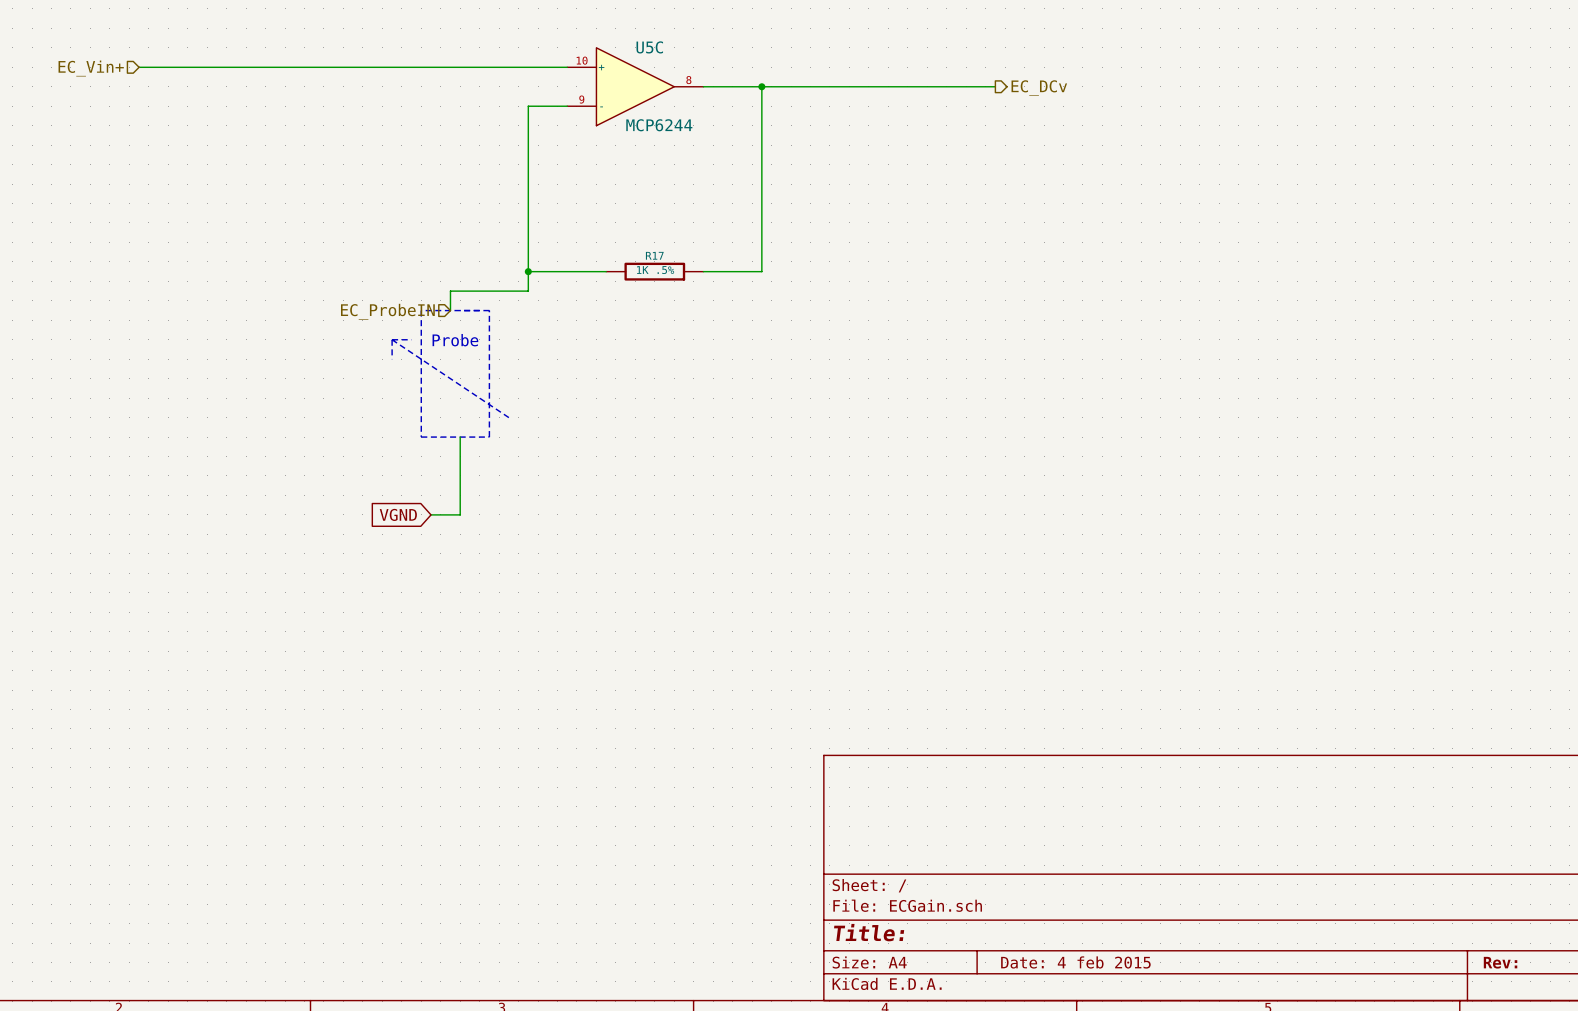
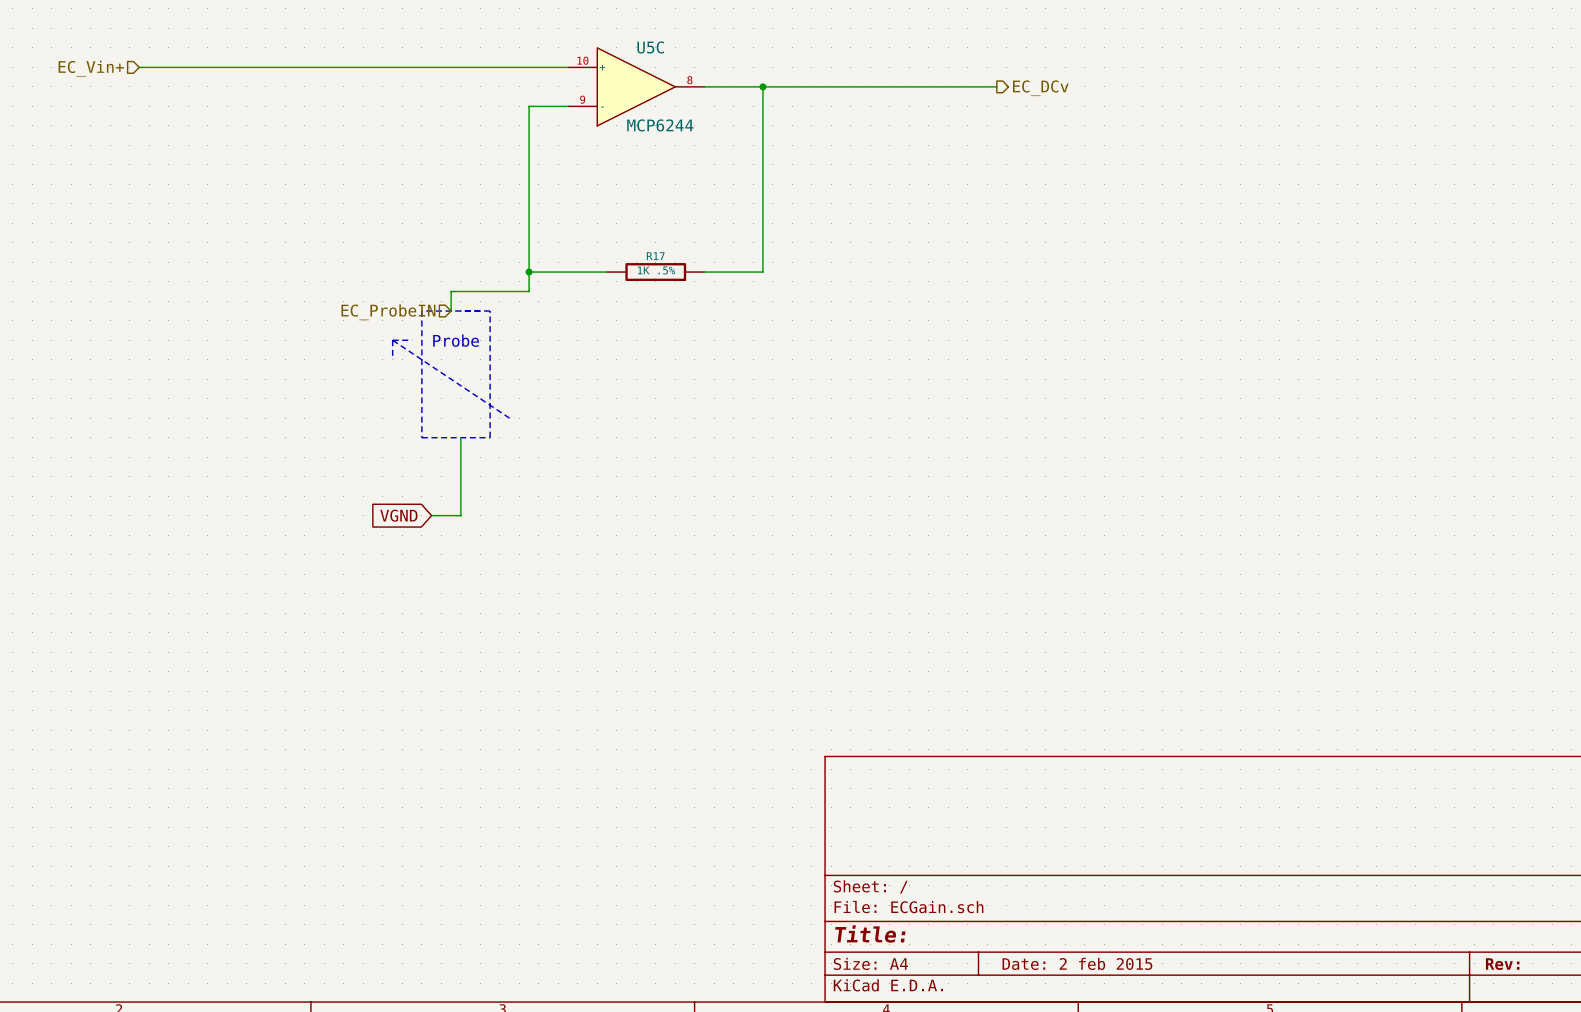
title block: Date: 4 feb 2015 (1075, 962) -> Date: 2 feb 2015 (1077, 963)

